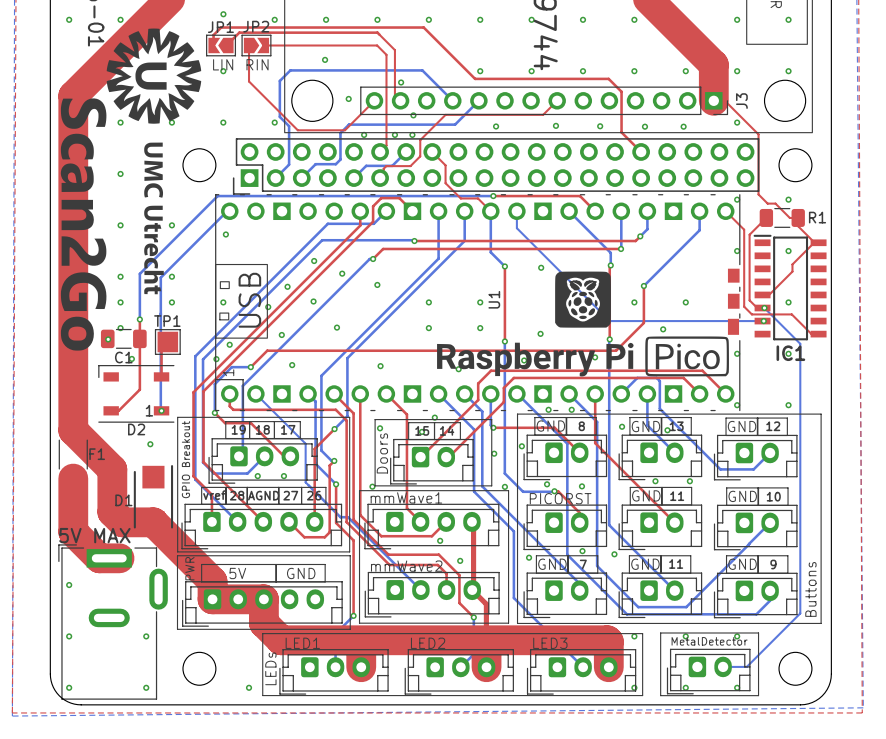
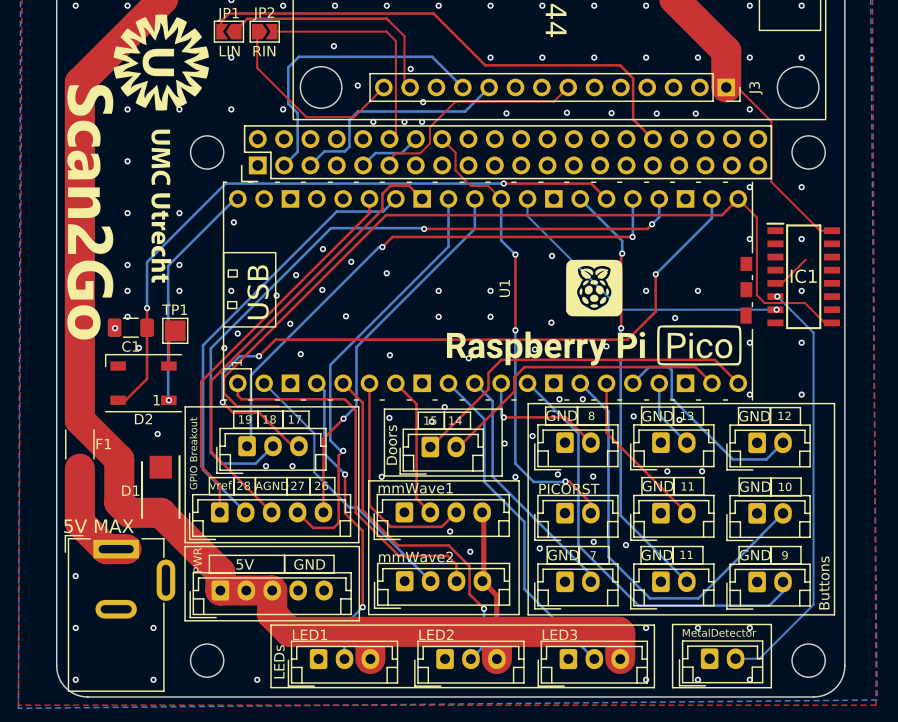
top track: (767, 203) (775, 203) (789, 217) (798, 217) (798, 226) (814, 242) (792, 264) (792, 271) -> (780, 191) (820, 230) (833, 230)
top track: none -> (738, 198) (721, 215) (386, 215) (224, 377) (224, 393) (237, 406) (278, 406)
top track: (766, 217) (749, 234) (749, 300) (757, 308) (764, 308) -> none
R1: (782, 217) -> none
IC1 name position: IC1 (790, 353) -> IC1 (803, 276)

